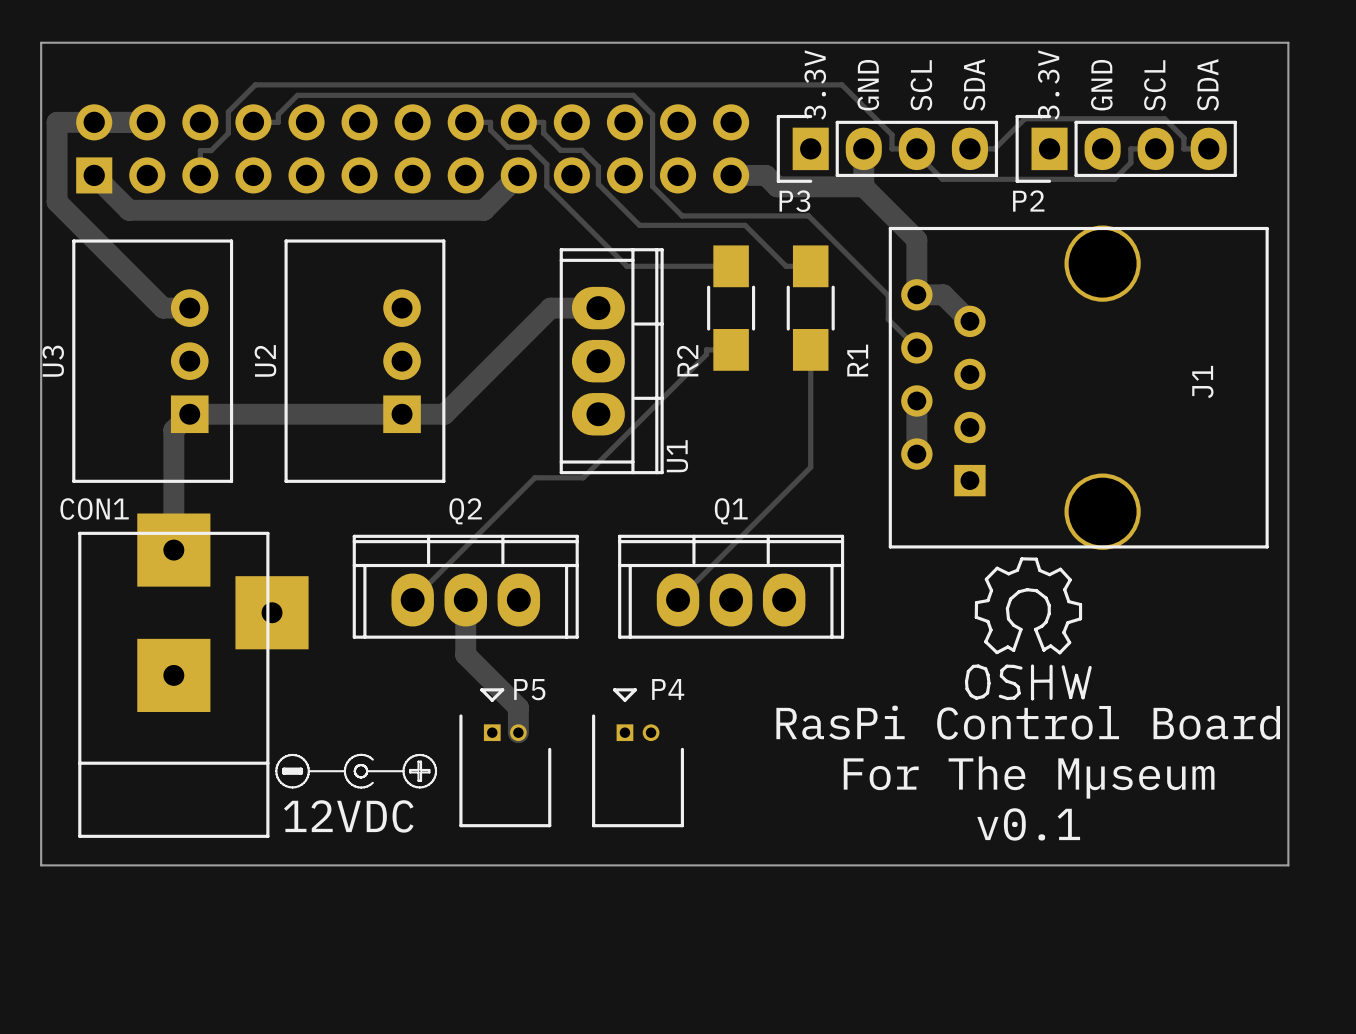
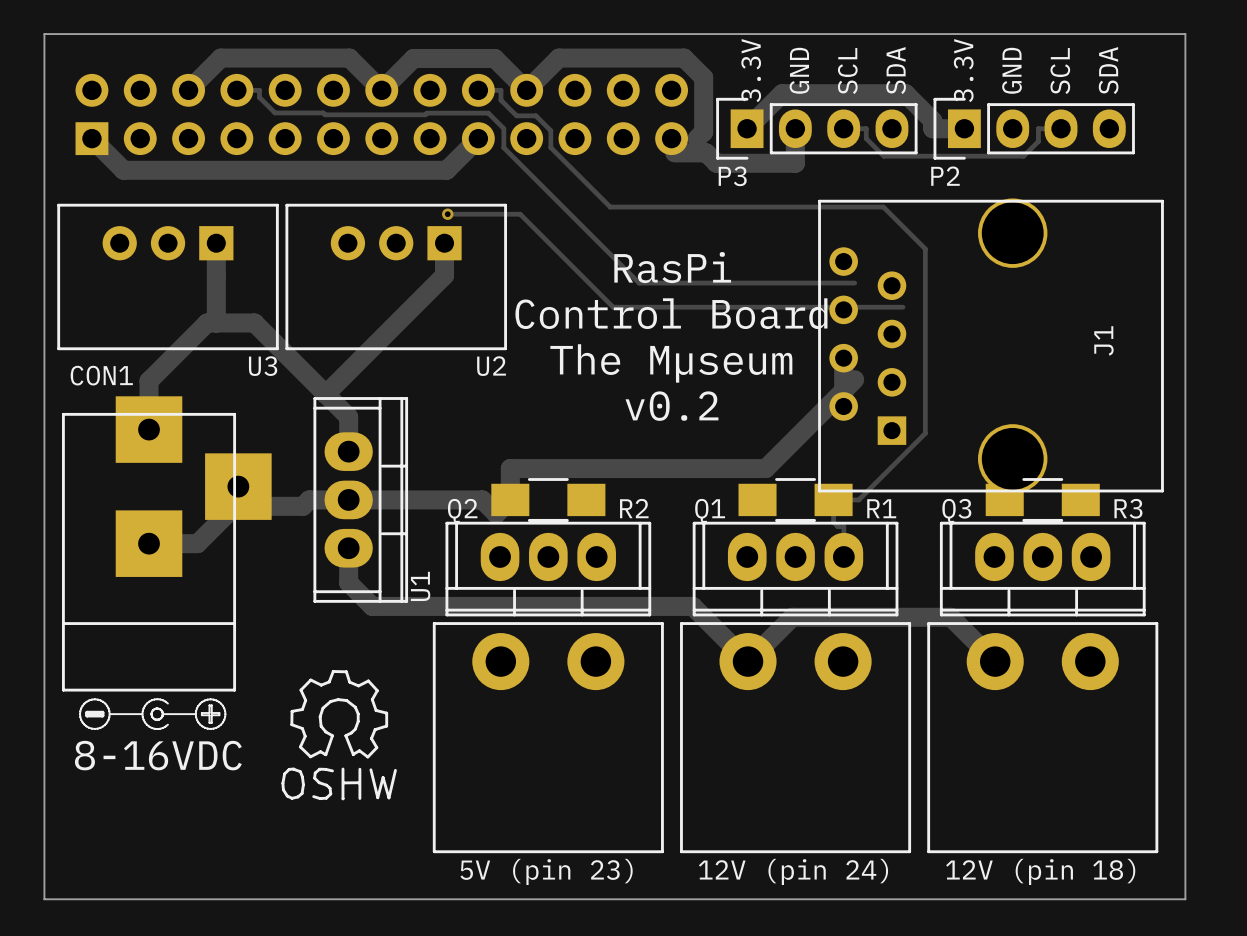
board edge: (41, 42) (1288, 42) (1288, 865) (41, 865) (41, 42) -> (44, 34) (44, 899) (1185, 899) (1185, 34) (44, 34)
track: none -> (188, 90) (220, 58) (349, 58) (381, 90) (413, 58) (494, 58) (526, 90) (558, 58) (684, 58) (703, 77) (703, 131) (697, 138)
track: none -> (236, 90) (259, 90) (259, 97) (275, 112) (323, 112) (325, 114) (488, 113) (503, 128) (503, 147) (639, 283) (854, 283)
track: none -> (478, 90) (500, 90) (500, 100) (516, 115) (535, 115) (550, 130) (550, 147) (610, 207) (883, 207) (925, 248) (925, 433) (858, 499) (833, 499) (833, 522) (837, 526) (843, 526) (843, 556)
track: (147, 122) (57, 122) (57, 201) (163, 308) (189, 308) -> none
track: (253, 122) (278, 122) (278, 114) (297, 95) (633, 95) (652, 114) (652, 186) (682, 215) (808, 215) (888, 295) (888, 319) (916, 347) -> none
track: (465, 122) (490, 122) (490, 130) (507, 147) (529, 147) (546, 164) (546, 186) (626, 266) (731, 266) -> none
track: (518, 122) (543, 122) (543, 133) (560, 150) (582, 150) (598, 166) (598, 184) (639, 225) (745, 225) (786, 266) (810, 266) -> none
part position: (412, 148) -> (381, 114)
track: none -> (747, 128) (782, 93) (905, 93) (932, 120) (932, 128) (964, 128)
track: (912, 148) (942, 179) (1114, 179) -> (843, 128) (866, 128) (866, 138) (883, 156) (1023, 156)
track: (916, 148) (892, 148) (892, 134) (841, 84) (255, 84) (228, 111) (228, 133) (211, 150) (200, 150) (200, 175) -> none
track: (969, 148) (994, 148) (1024, 118) (1164, 118) (1183, 138) (1183, 148) (1208, 148) -> none
track: (94, 175) (129, 210) (483, 210) (518, 175) -> (91, 138) (123, 170) (446, 170) (478, 138)
track: (863, 186) (916, 239) (916, 294) (943, 294) (969, 321) -> none
track: none -> (447, 214) (520, 214) (613, 307) (903, 307)
via: none -> (447, 214)
track: none -> (216, 243) (216, 322)
track: none -> (444, 243) (444, 275) (325, 394)
text: none -> RasPi (672, 267)
track: (598, 308) (550, 308) (444, 414) (189, 414) (173, 430) (173, 550) -> none
R2 rotation: 0° (731, 308) -> 90° clockwise (548, 499)
R2 position: (731, 308) -> (548, 499)
R1 rotation: 0° (810, 308) -> 90° clockwise (795, 499)
R1 position: (810, 308) -> (795, 499)
track: (731, 349) (706, 349) (706, 354) (583, 477) (534, 477) (412, 600) -> none
track: (810, 349) (810, 467) (678, 600) -> none
text: none -> Control Board (671, 313)
U2 name position: U2 (265, 360) -> U2 (491, 366)
R2 name position: R2 (687, 360) -> R2 (634, 508)
R1 name position: R1 (857, 360) -> R1 (881, 508)
U3 name position: U3 (53, 361) -> U3 (263, 366)
U3 rotation: 0° (152, 361) -> 90° counterclockwise (168, 276)
U2 rotation: 0° (364, 361) -> 90° counterclockwise (396, 276)
U1 position: (611, 361) -> (360, 499)
text: none -> The Mµseum (671, 363)
track: none -> (854, 379) (765, 468) (510, 468) (510, 499) (496, 513) (482, 499) (309, 499) (302, 506) (234, 506) (197, 543) (149, 543)
text: none -> v0.2 (671, 406)
track: none -> (149, 429) (149, 381) (207, 322) (254, 322) (348, 417) (348, 451)
Q2 name position: Q2 (465, 511) -> Q2 (462, 510)
Q1 name position: Q1 (731, 511) -> Q1 (710, 510)
CON1 footprint: [78, 513, 309, 838] -> [61, 396, 272, 692]
R3: none -> (1042, 499)
drawing: [964, 557, 1092, 701] -> none
Q2 rotation: 0° (465, 586) -> 180° (548, 569)
Q1 rotation: 0° (731, 586) -> 180° (795, 569)
Q1 position: (731, 586) -> (795, 569)
track: (465, 600) (465, 654) (518, 707) (518, 732) -> none
track: none -> (348, 548) (348, 582) (372, 606) (692, 606) (748, 661) (792, 617) (950, 617) (995, 661)
Q3: none -> (1042, 569)
text: RasPi Control Board (1028, 722) -> none
drawing: none -> [281, 670, 397, 801]
line: (292, 754) (304, 759) (308, 771) (304, 782) (292, 787) (281, 782) (276, 771) (281, 759) (292, 754) -> (94, 699) (105, 703) (109, 714) (105, 724) (94, 728) (84, 724) (80, 714) (84, 703) (94, 699)
line: (419, 754) (431, 759) (436, 771) (431, 782) (419, 787) (408, 782) (403, 771) (408, 759) (419, 754) -> (210, 699) (221, 703) (225, 714) (221, 724) (210, 728) (200, 724) (195, 714) (200, 703) (210, 699)
P5: (505, 757) -> none
P4: (638, 757) -> none
line: (372, 759) (364, 755) (355, 756) (347, 762) (344, 771) (347, 780) (355, 786) (364, 787) (372, 782) -> (167, 703) (160, 699) (151, 700) (144, 705) (142, 714) (144, 722) (151, 727) (160, 728) (167, 724)
line: (418, 761) (421, 761) (421, 769) (429, 769) (429, 772) (421, 772) (421, 780) (418, 780) (418, 772) (410, 772) (410, 769) (418, 769) (418, 761) -> (209, 705) (211, 705) (211, 713) (219, 713) (219, 715) (211, 715) (211, 722) (209, 722) (209, 715) (201, 715) (201, 713) (209, 713) (209, 705)
line: (361, 764) (365, 766) (367, 771) (365, 775) (361, 777) (356, 775) (354, 771) (356, 766) (361, 764) -> (157, 708) (161, 710) (162, 714) (161, 718) (157, 719) (153, 718) (151, 714) (153, 710) (157, 708)
line: (284, 769) (284, 772) (300, 772) (300, 769) (284, 769) -> (87, 712) (87, 715) (102, 715) (102, 712) (87, 712)
line: (309, 771) (344, 771) -> (110, 714) (141, 714)
line: (367, 771) (402, 771) -> (163, 714) (195, 714)
text: For The Mµseum (1029, 777) -> none
text: 12VDC (348, 816) -> 8-16VDC (158, 755)
5V (pin 23): none -> (548, 737)
12V (pin 24): none -> (795, 737)
12V (pin 18): none -> (1042, 737)
text: v0.1 (1028, 824) -> none

